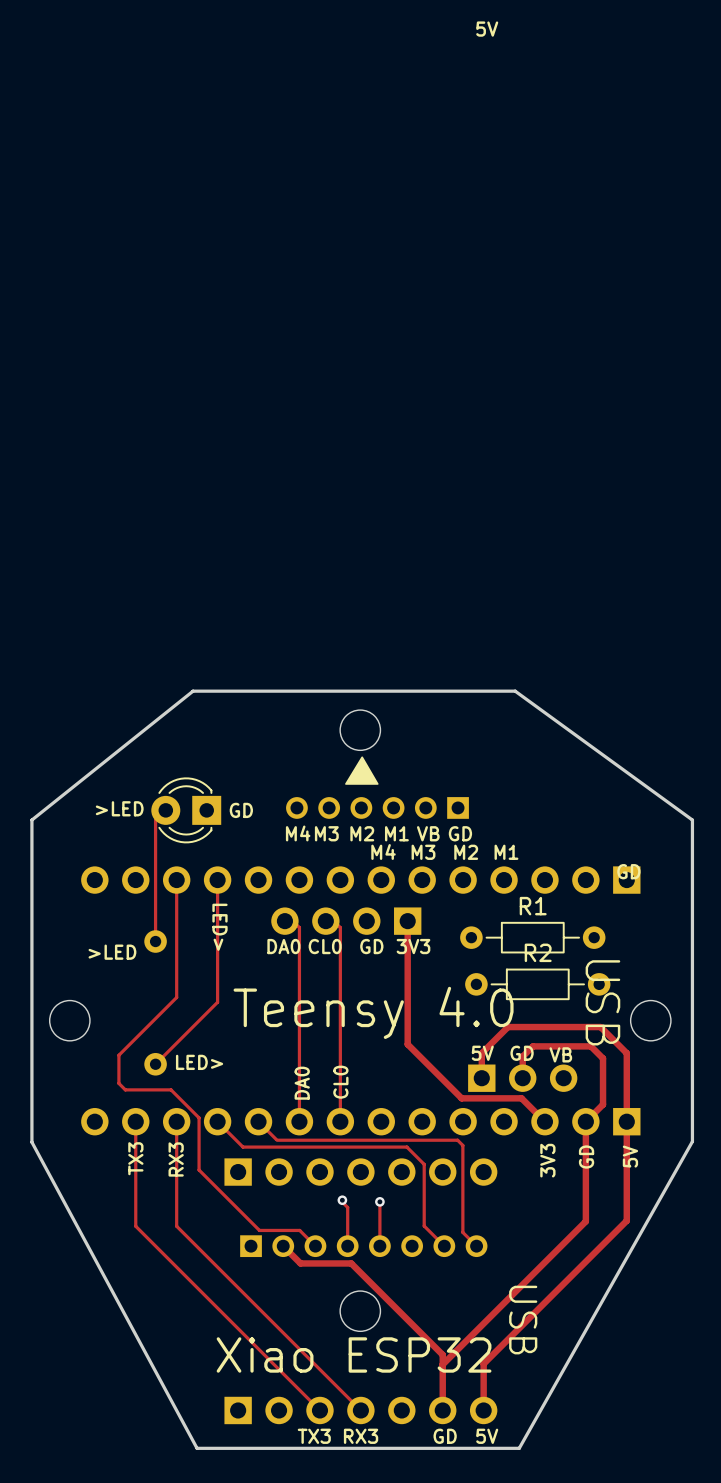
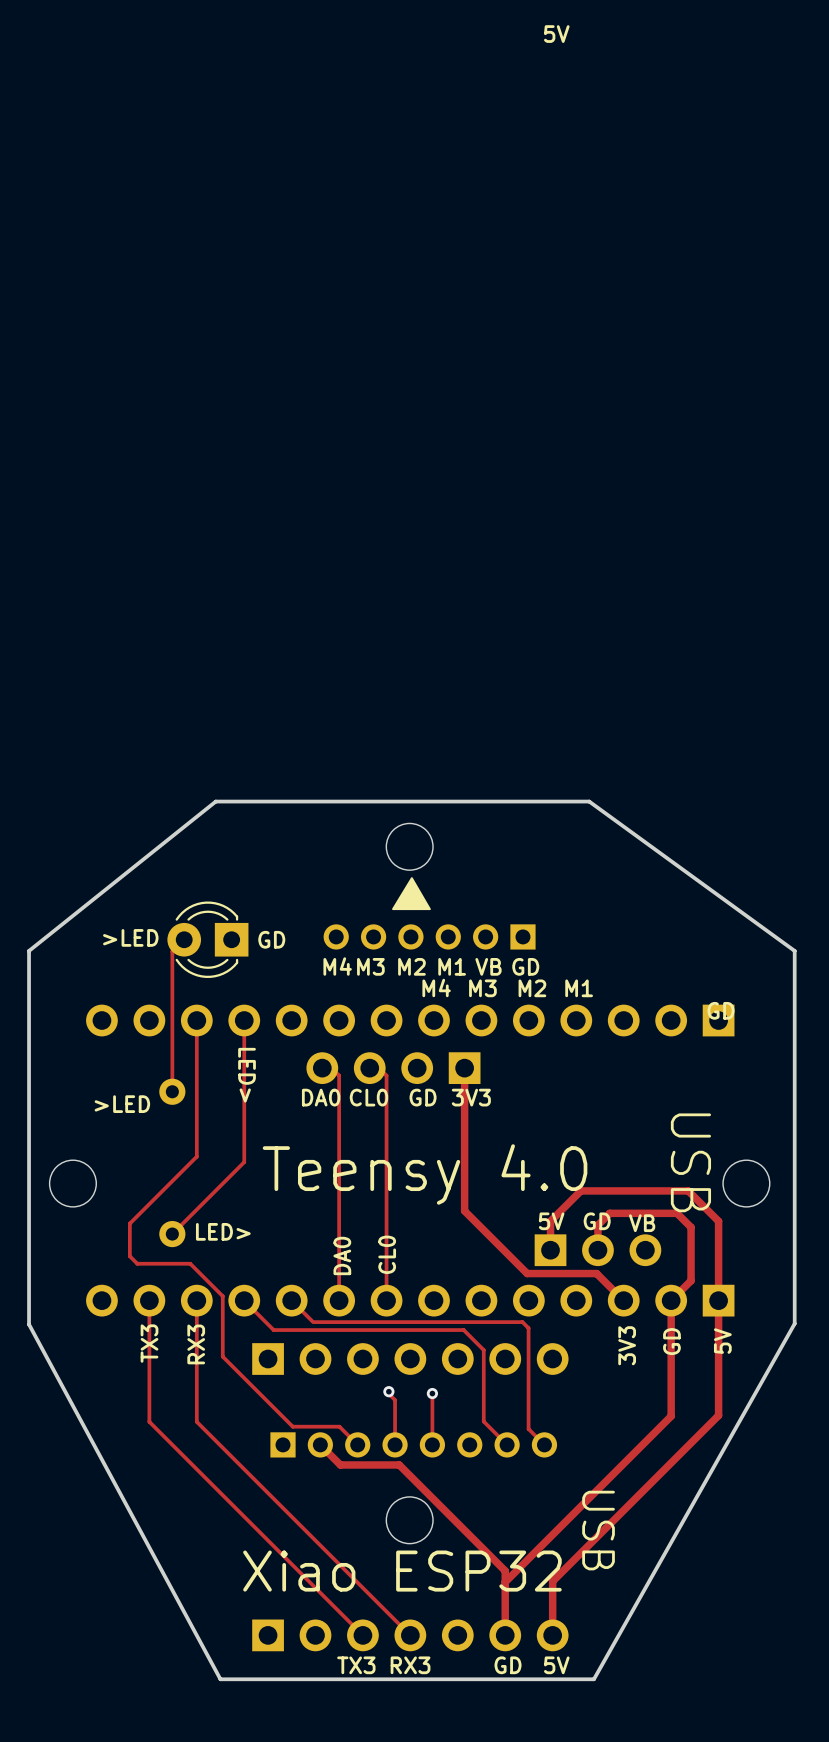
R1: (532, 937) -> none
R2: (537, 984) -> none

